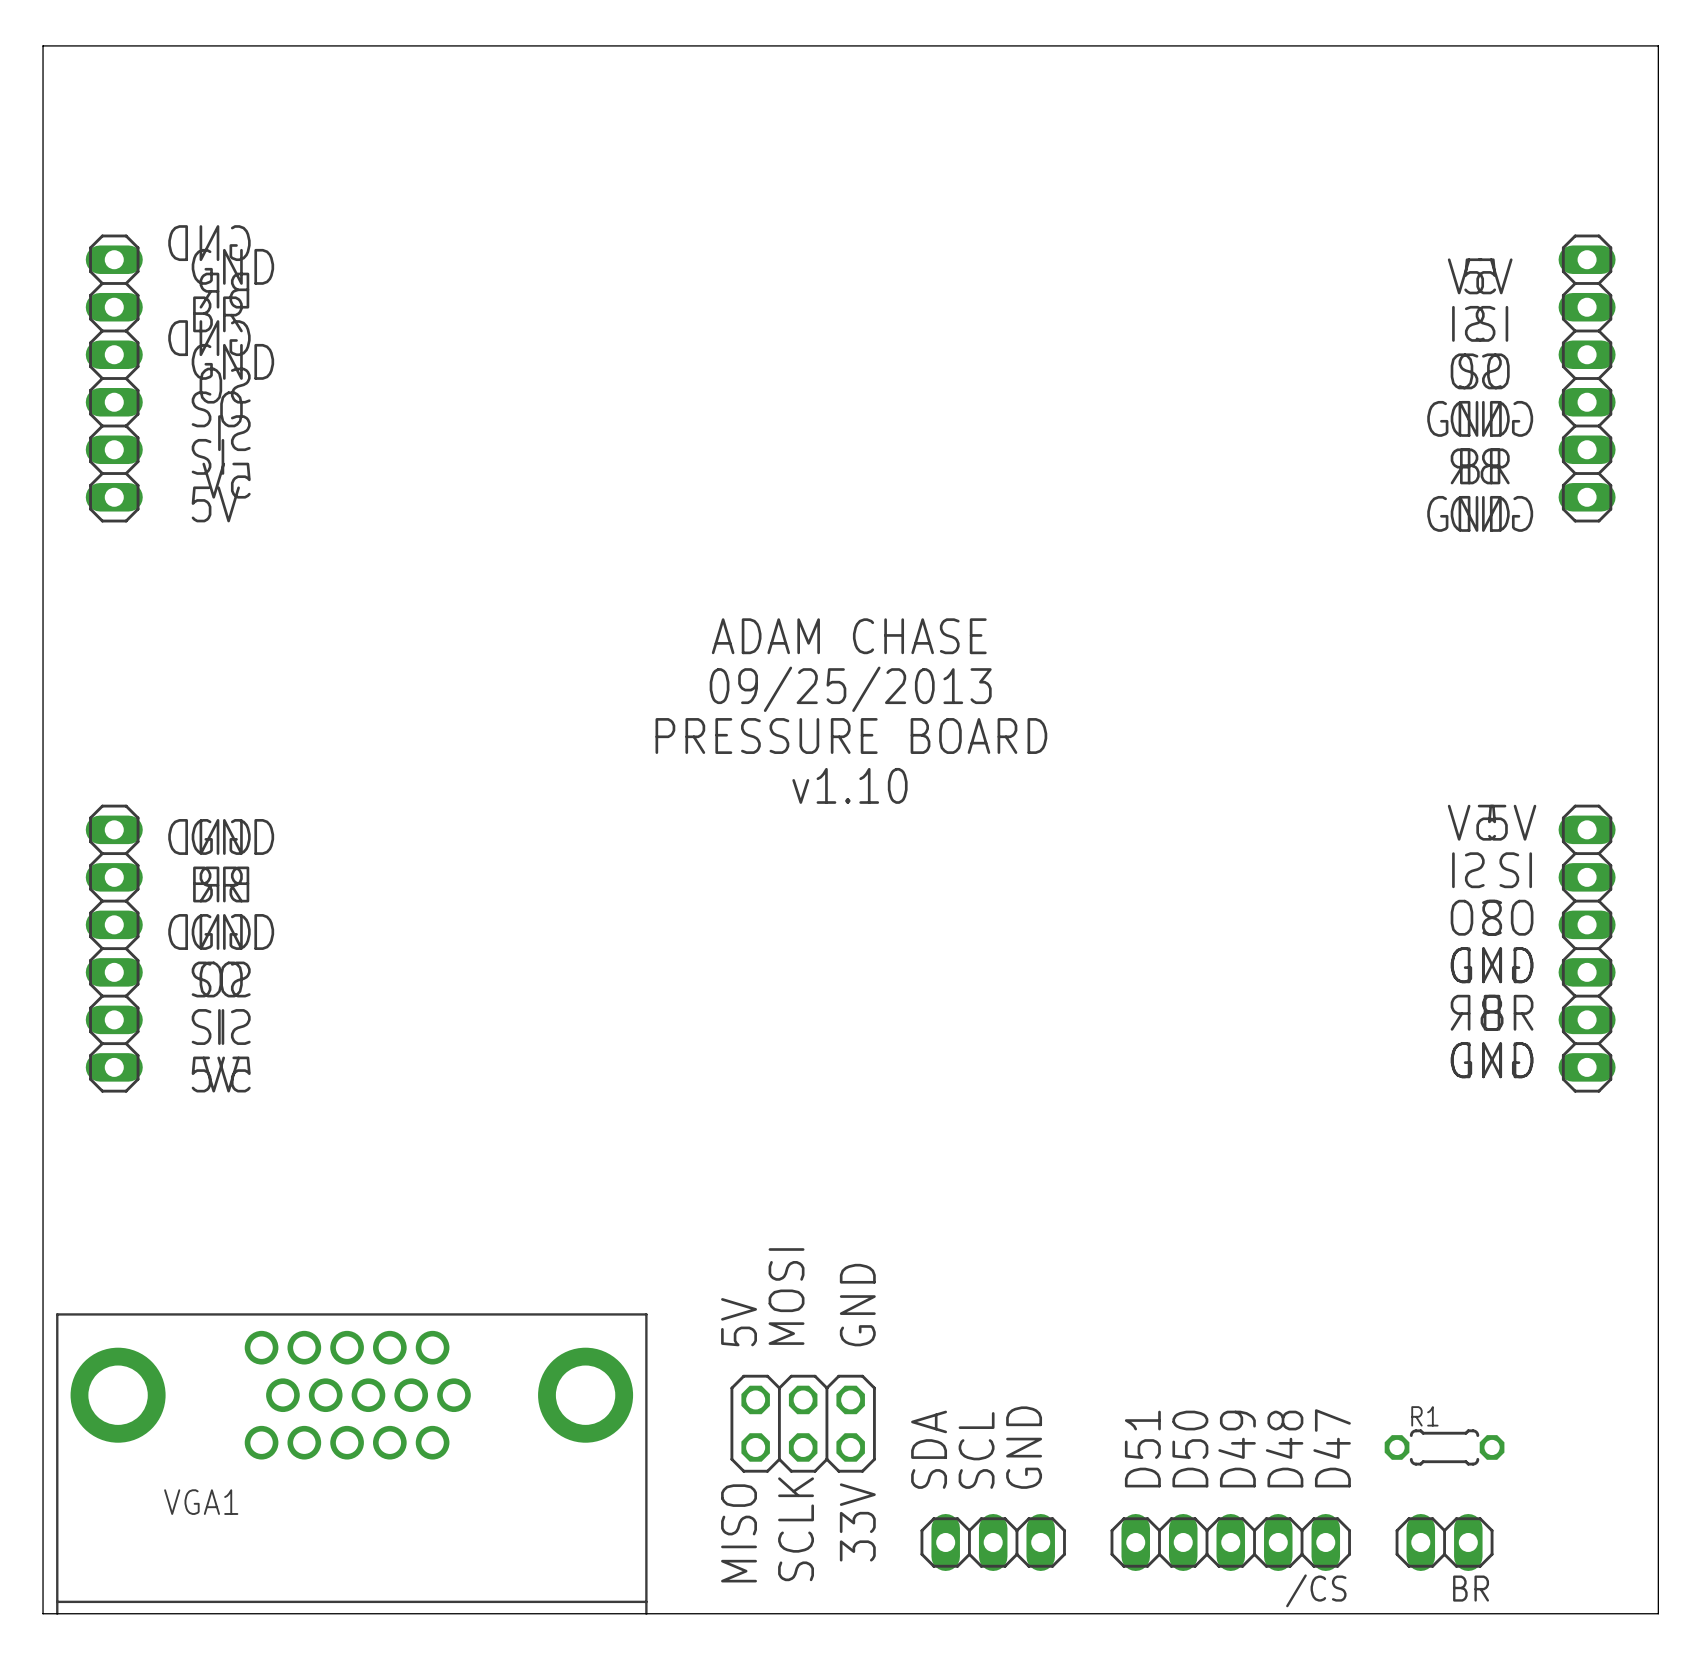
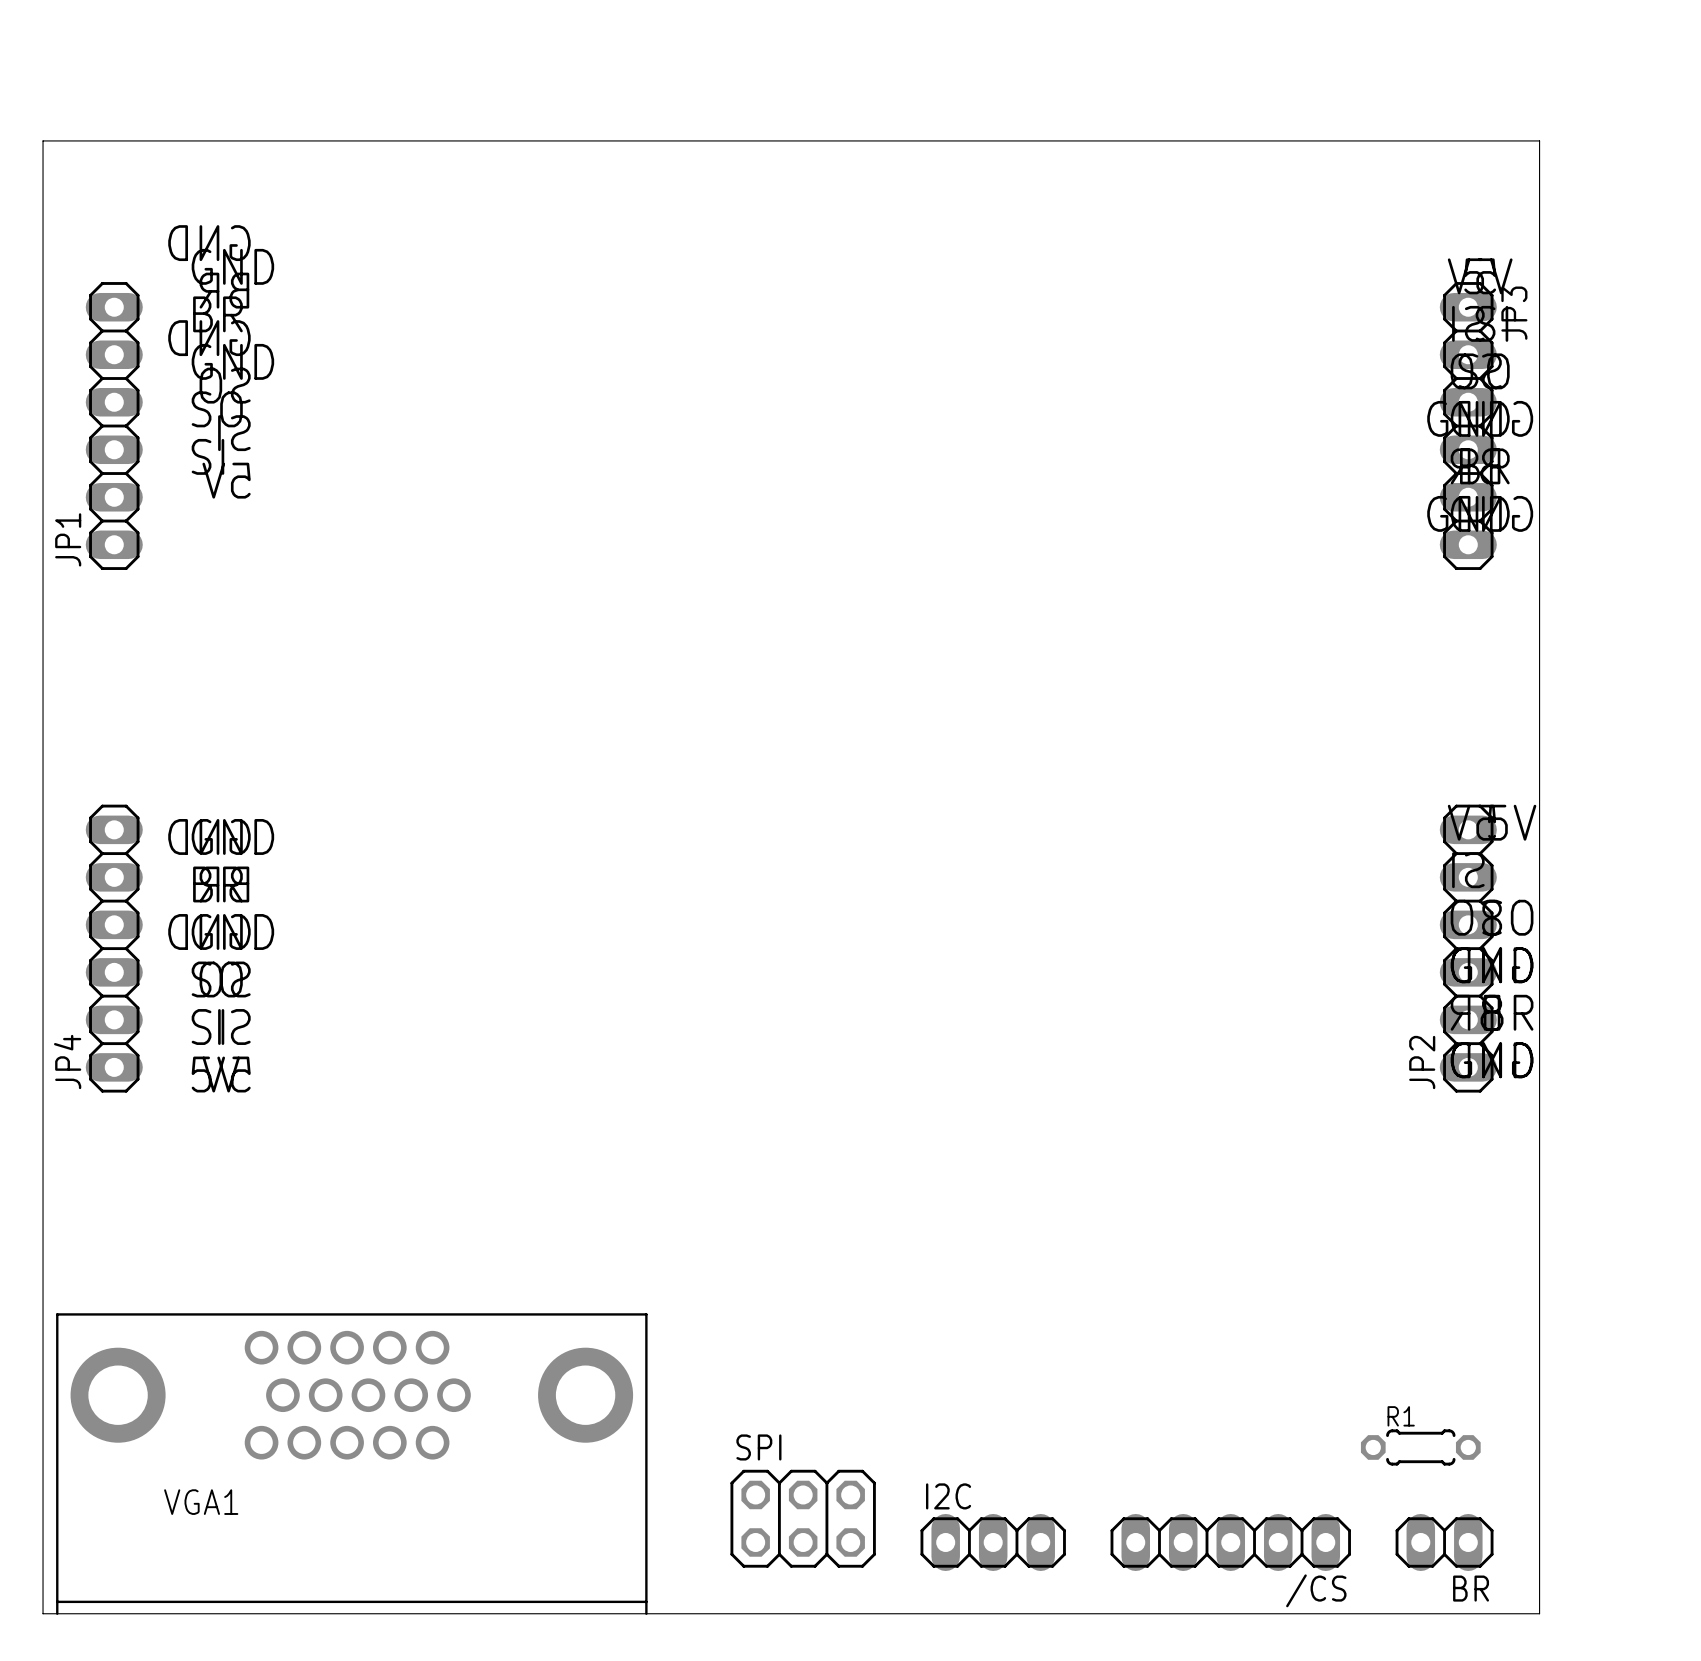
board edge: (43, 140) (43, 45) (1658, 45) (1658, 1613) (1539, 1613) -> (43, 140) (1539, 140) (1539, 1613)
part: (114, 378) -> none
part: (1587, 378) -> none
JP1: none -> (114, 426)
JP3: none -> (1468, 426)
text: 5V (215, 504) -> none
text: ADAM CHASE (849, 636) -> none
text: 09/25/2013 (850, 689) -> none
text: PRESSURE BOARD (851, 736) -> none
text: v1.10 (849, 785) -> none
text: SI (1515, 870) -> none
JP2: none -> (1468, 948)
part: (1587, 948) -> none
JP4 name: none -> JP4 (67, 1061)
text: MOSI (786, 1296) -> none
text: GND (857, 1305) -> none
text: 5V (739, 1322) -> none
part: (803, 1423) -> none
text: GND (1024, 1447) -> none
R1 position: (1444, 1447) -> (1420, 1447)
text: D47 (1332, 1448) -> none
text: SDA (929, 1449) -> none
text: D51 (1142, 1449) -> none
text: D50 (1190, 1449) -> none
text: D49 (1237, 1449) -> none
text: D48 (1284, 1449) -> none
text: SCL (976, 1450) -> none
I2C name: none -> I2C (948, 1496)
SPI: none -> (803, 1518)
text: 33V (857, 1522) -> none
text: SCLK (796, 1529) -> none
text: MISO (739, 1533) -> none

